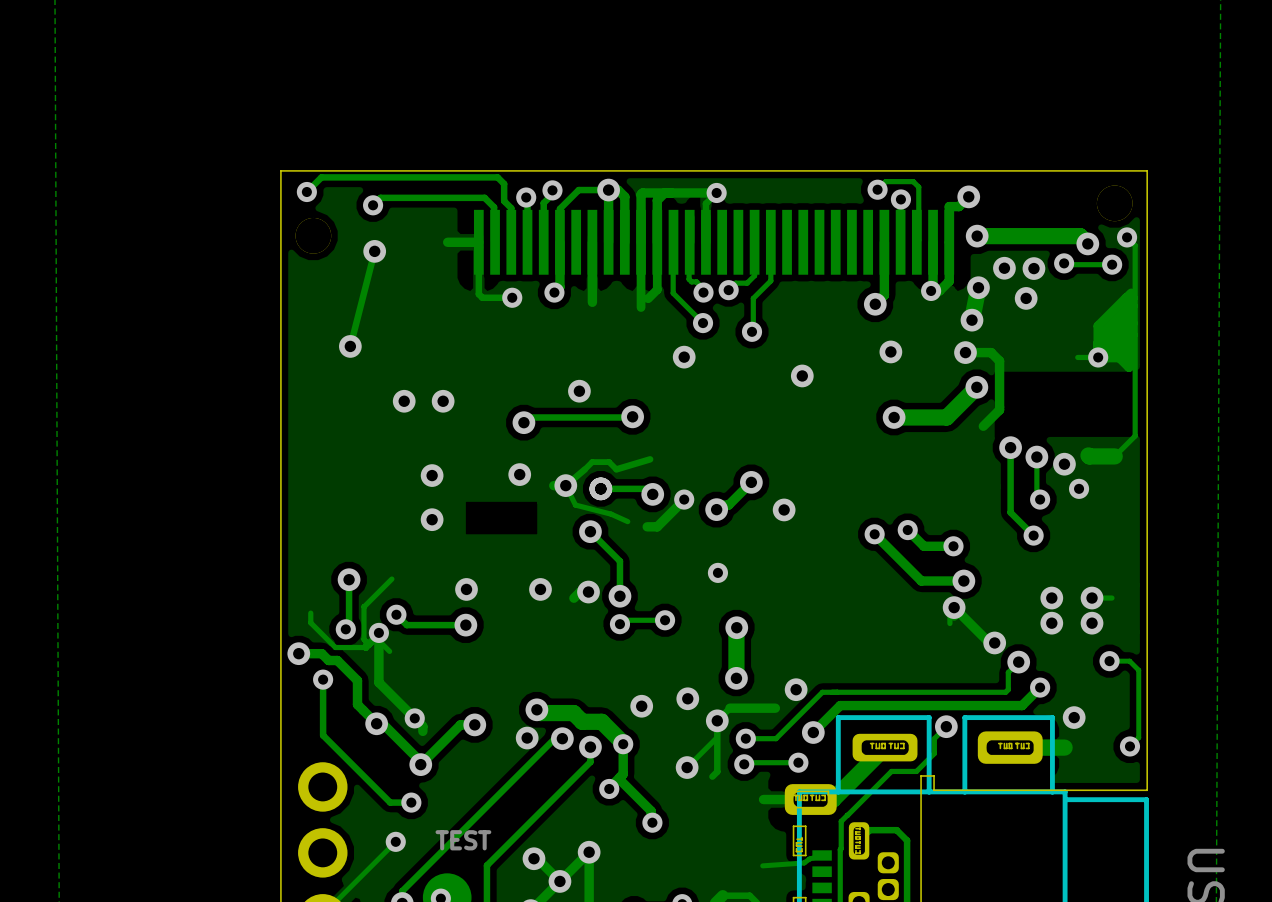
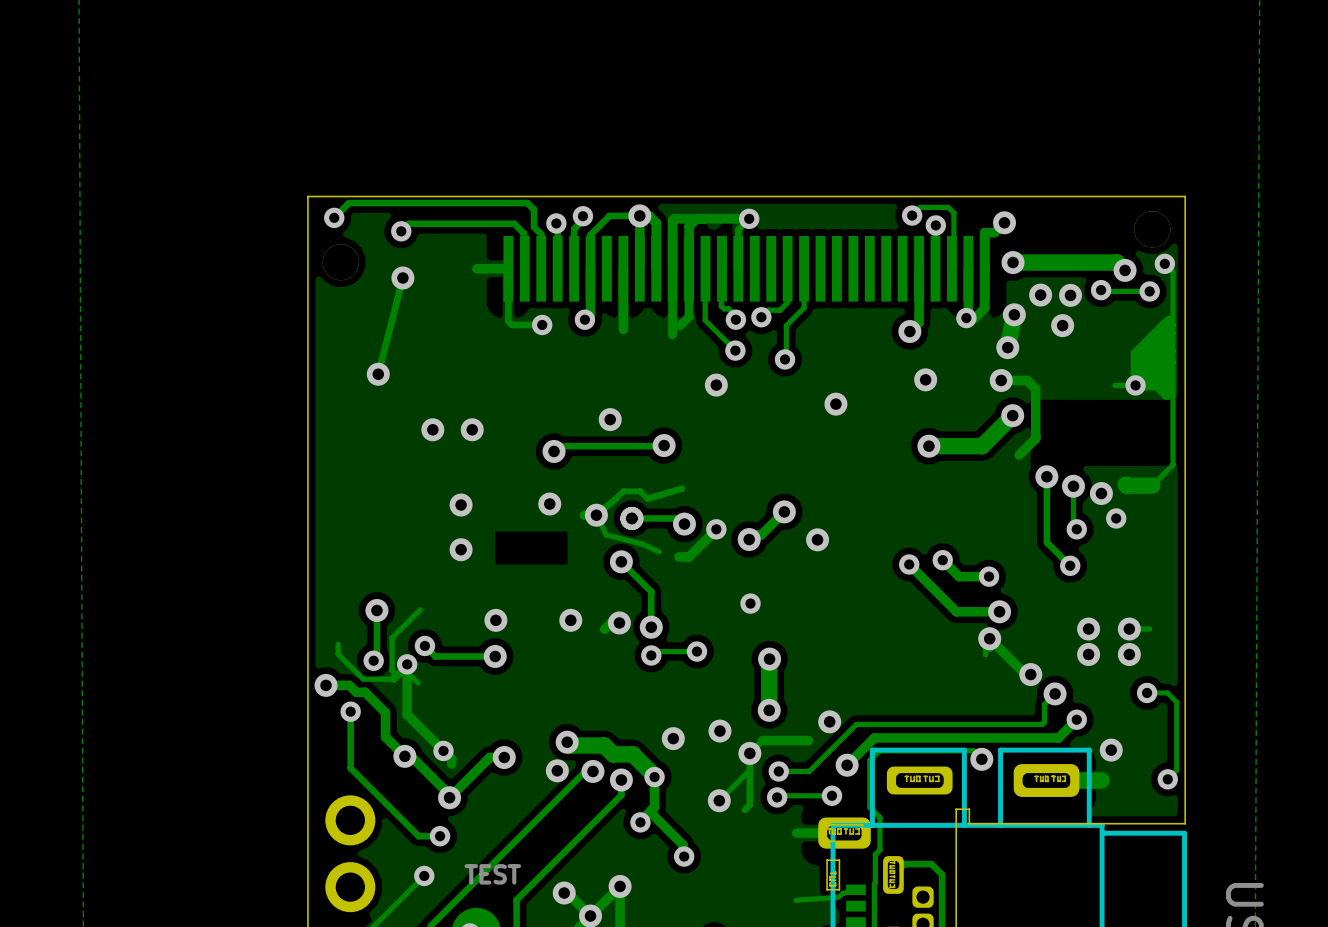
track: (946, 726) (934, 738) (934, 753) (916, 771) (891, 771) (841, 821) -> (981, 759) (973, 750) (879, 750) (869, 760) (869, 807) (879, 817) (879, 849) (875, 854)
track: (885, 747) (833, 799) (810, 799) -> none

